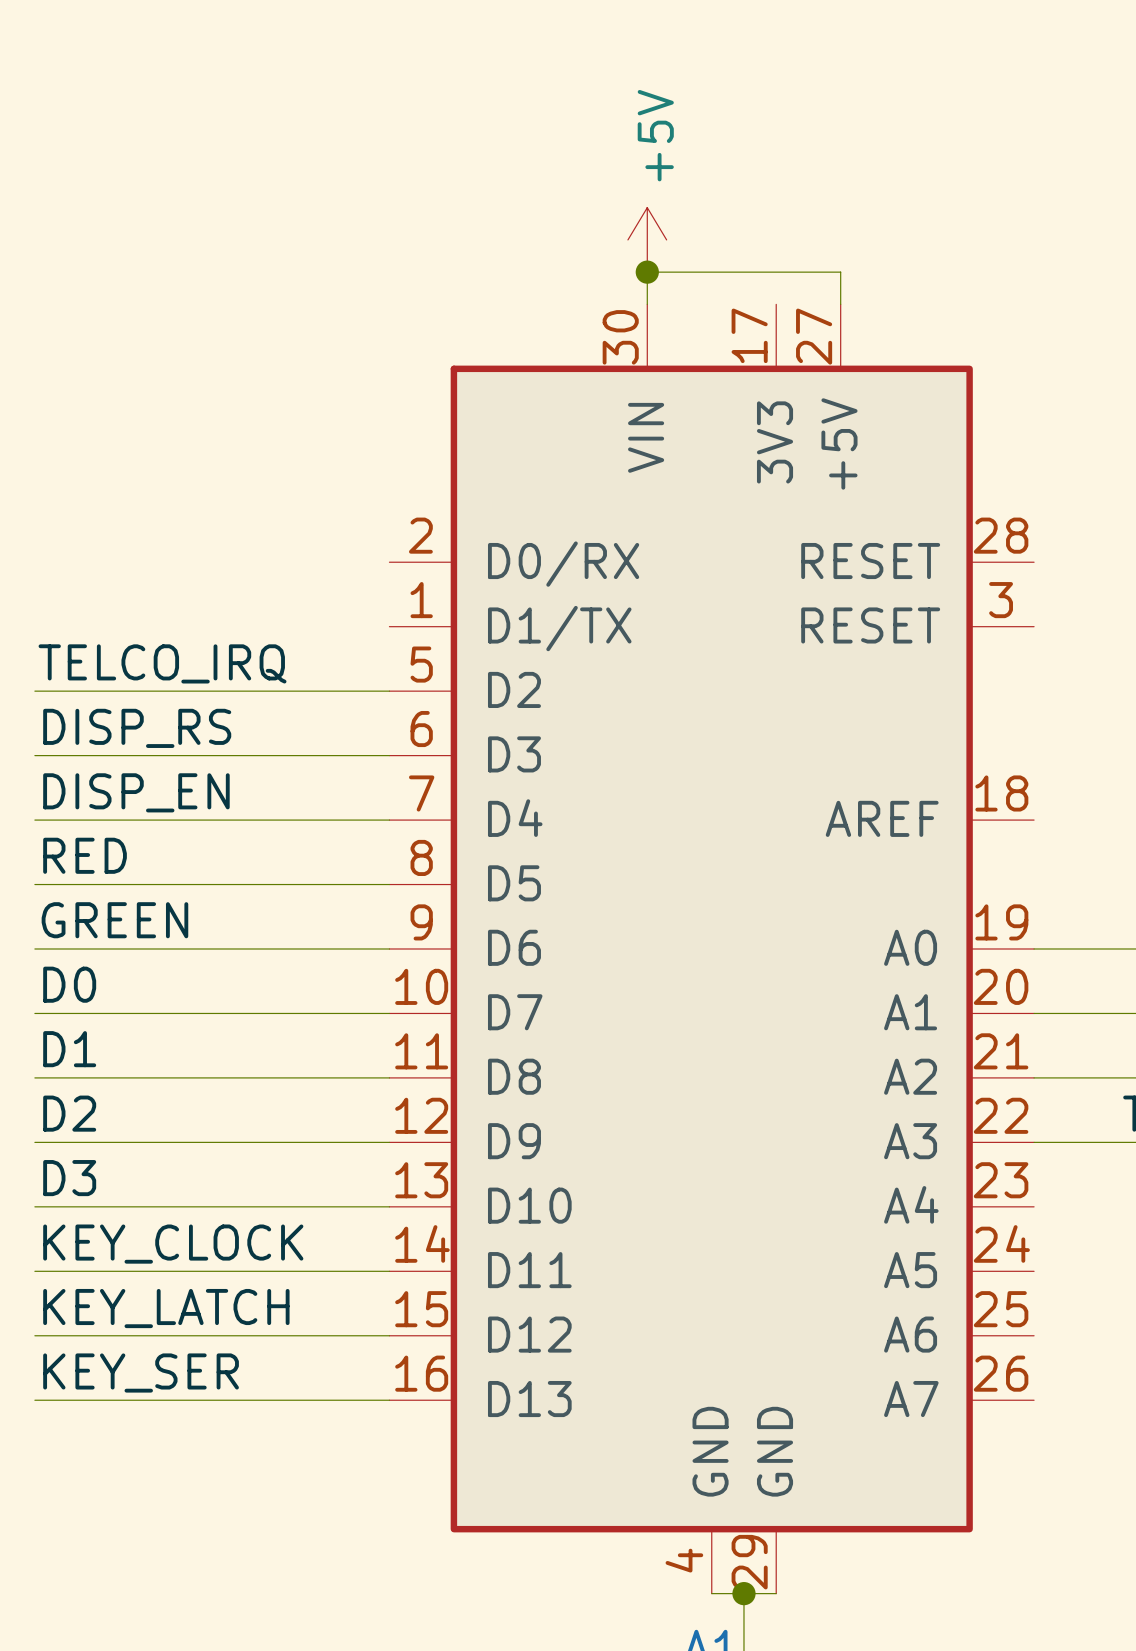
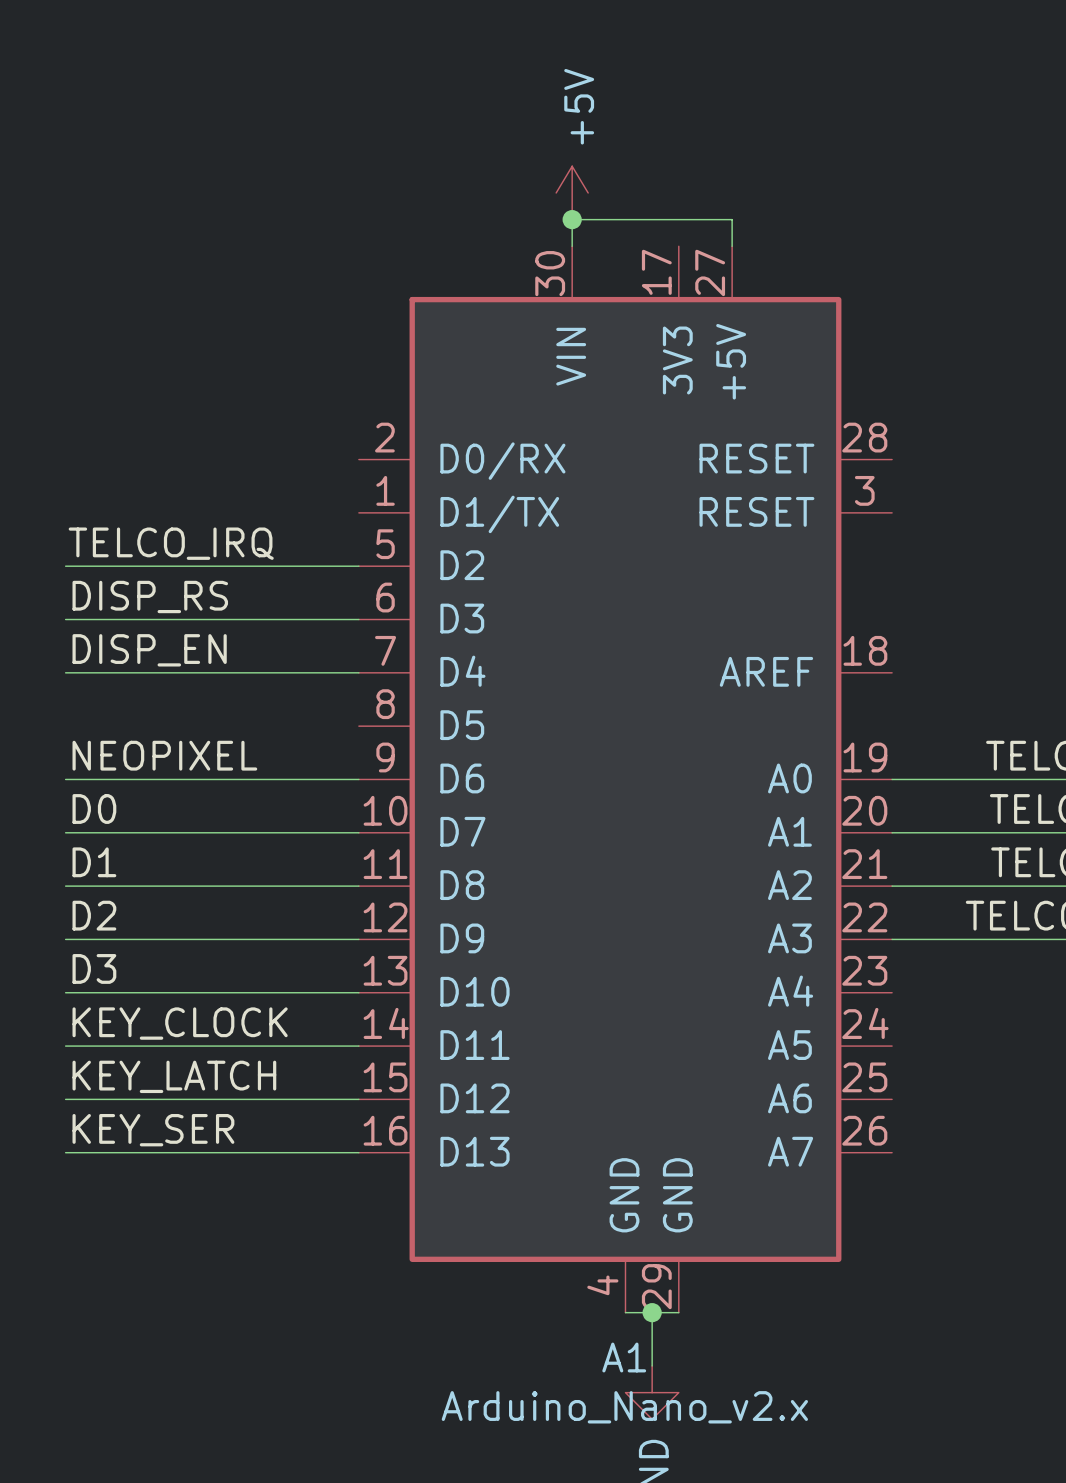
label: RED (85, 855) -> none
wire: (34, 884) (389, 884) -> none
label: GREEN (114, 920) -> NEOPIXEL (164, 755)

